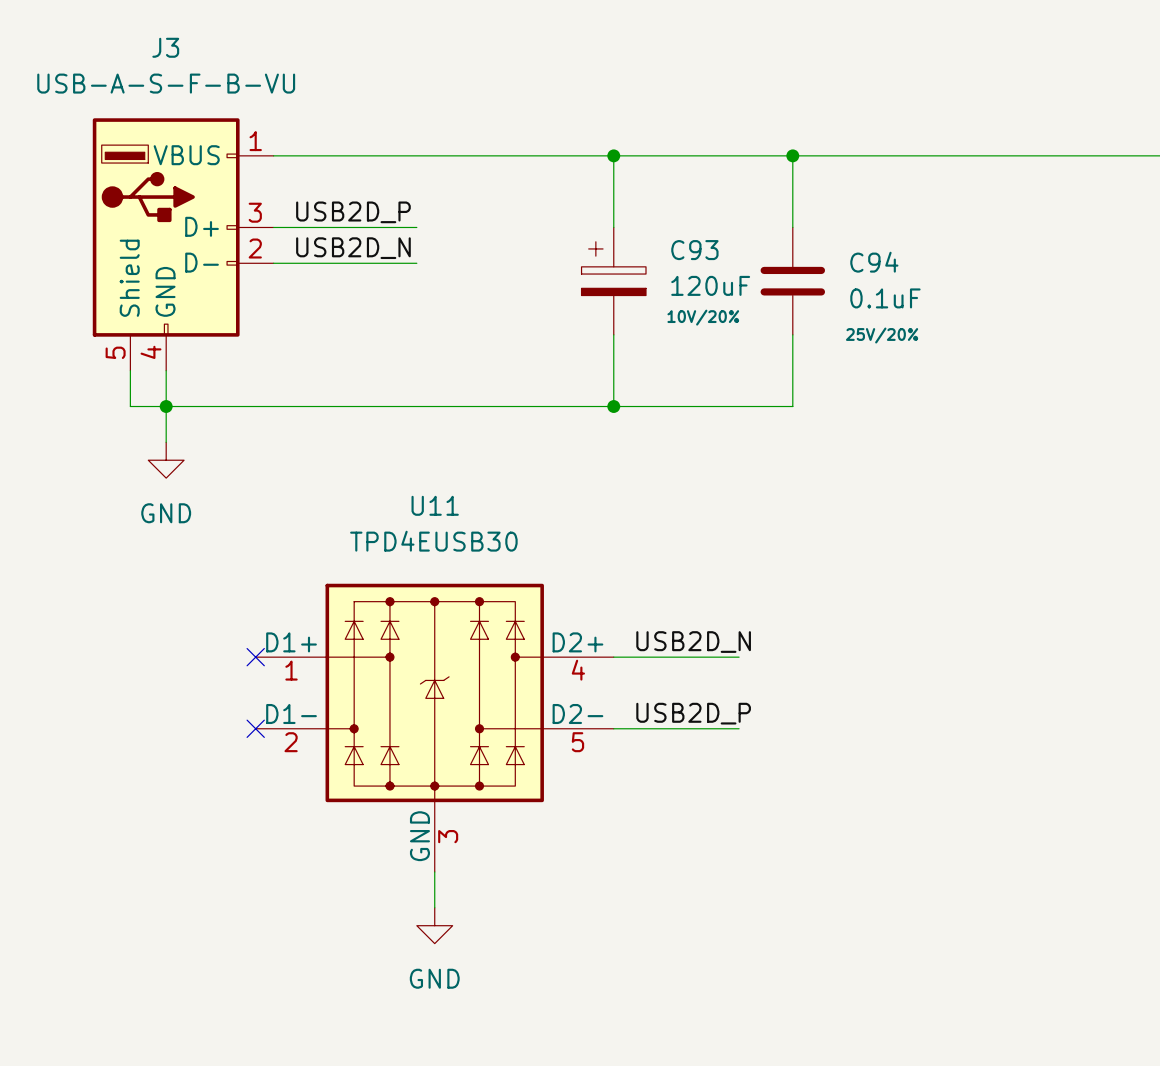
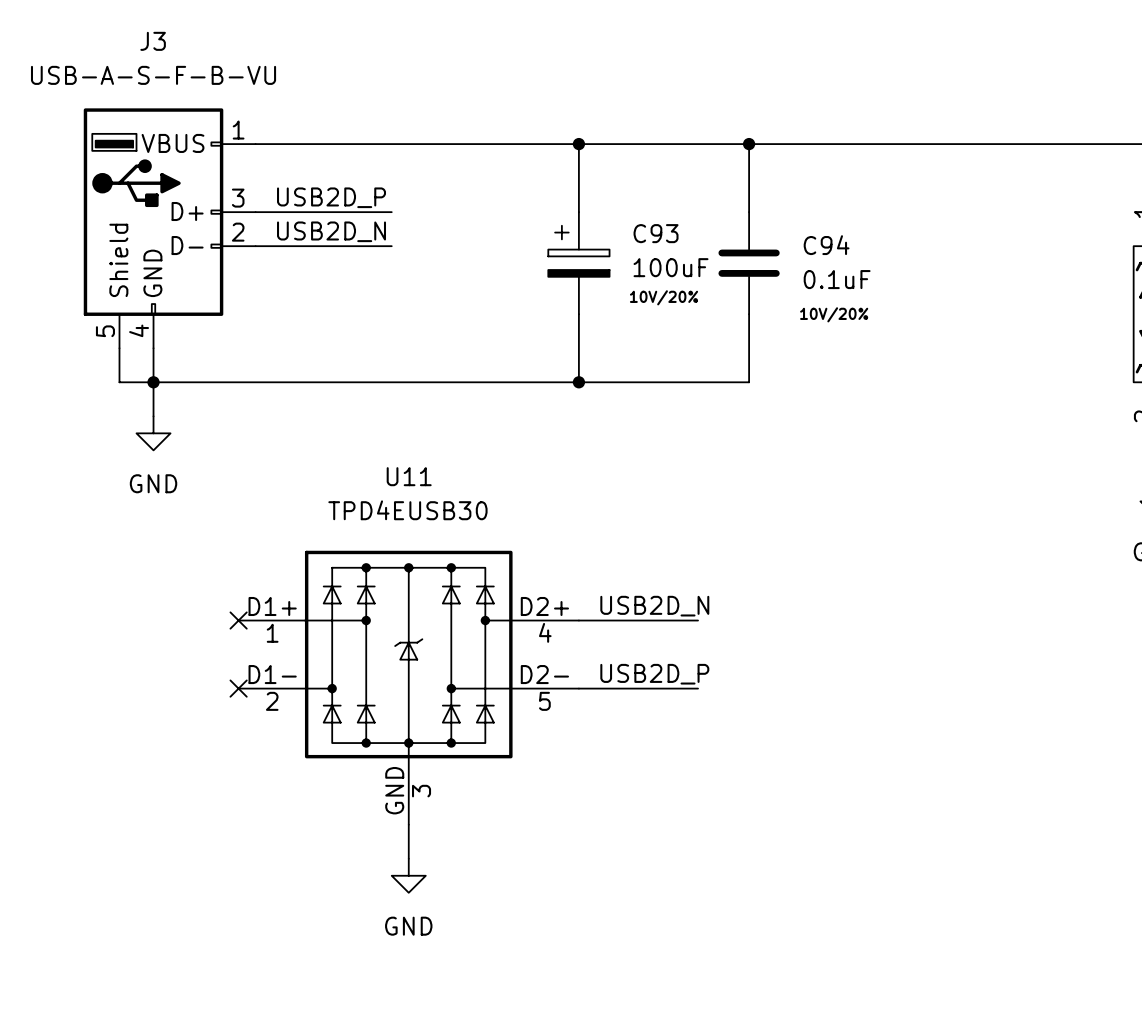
C93 value: 120uF (710, 285) -> 100uF (671, 267)
C94 text: 25V/20% (882, 335) -> 10V/20% (834, 314)

